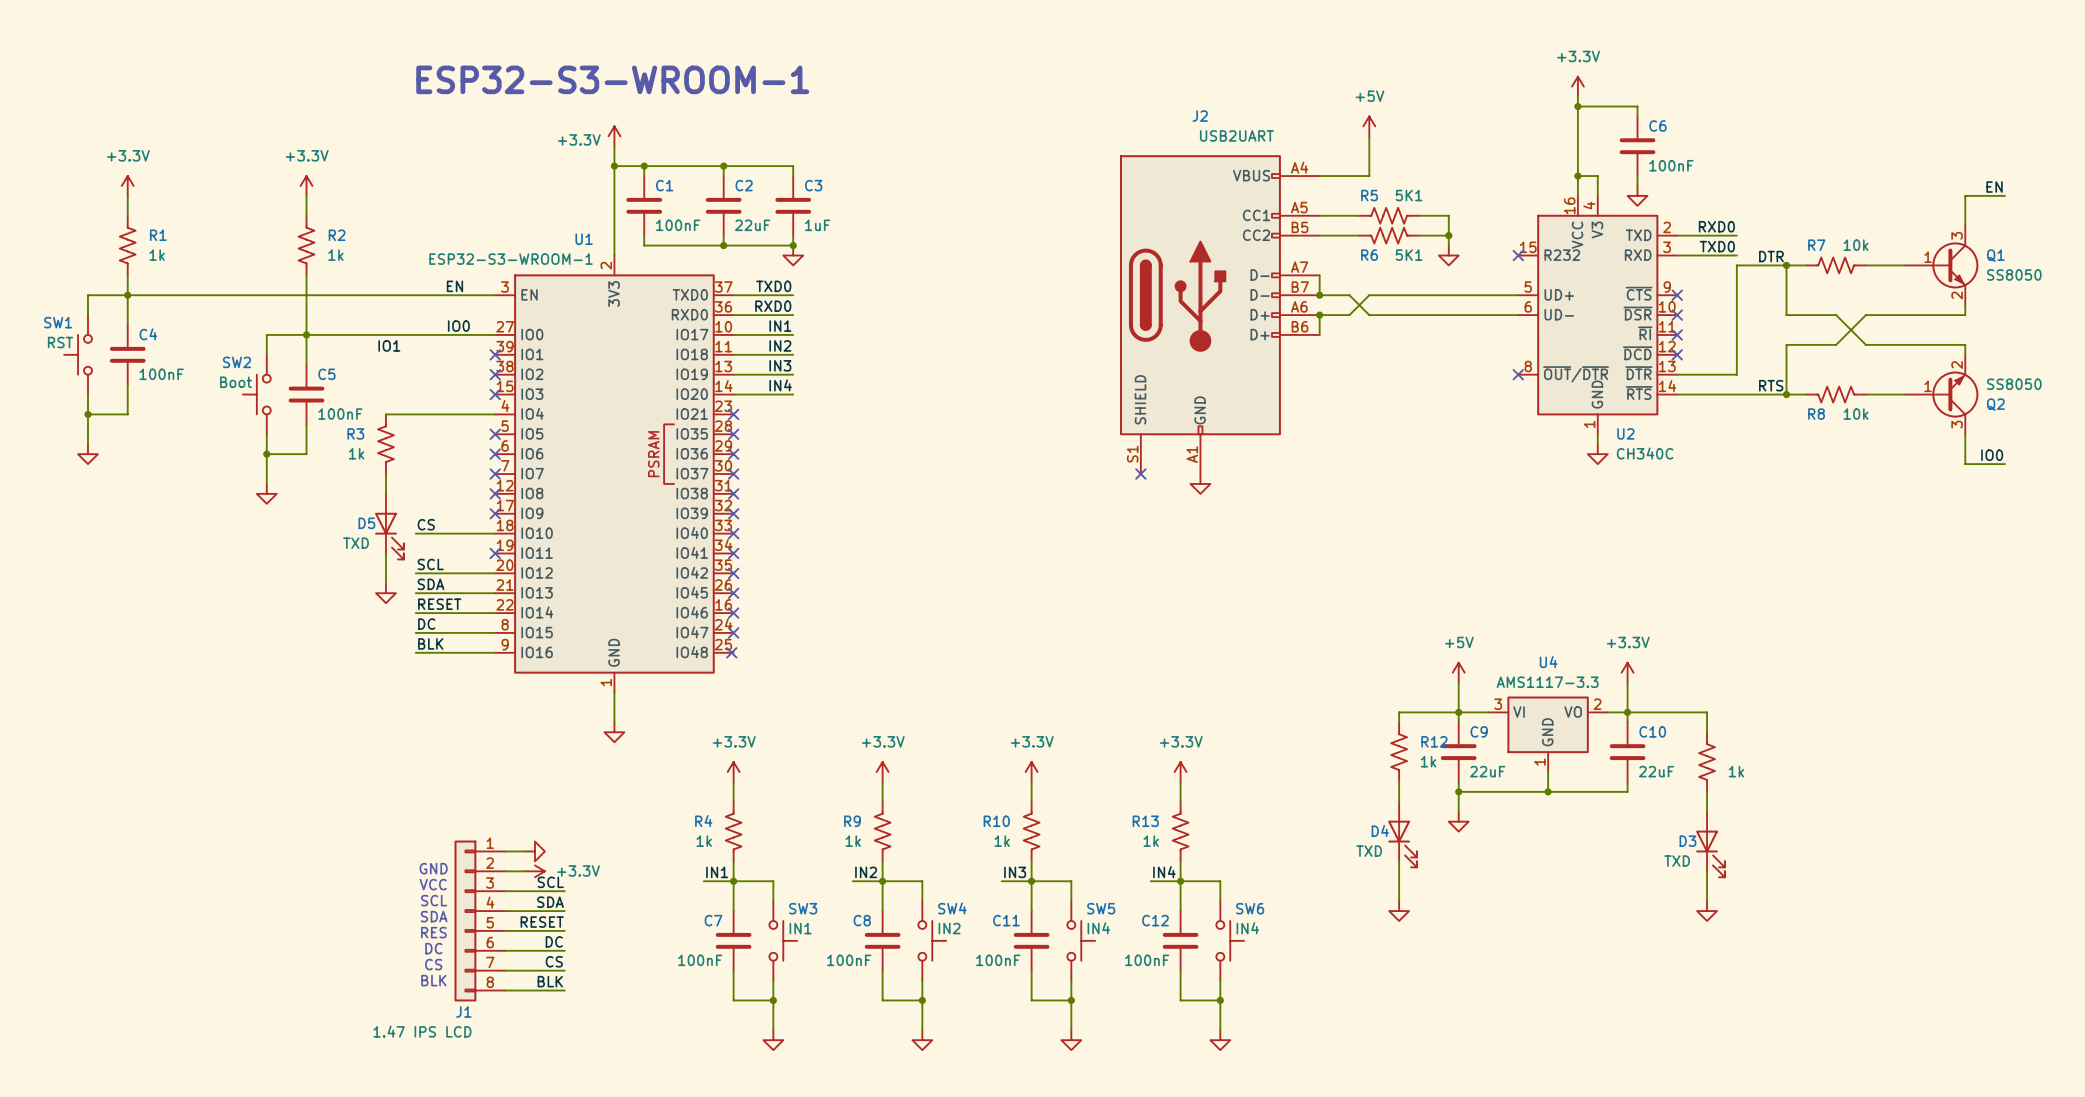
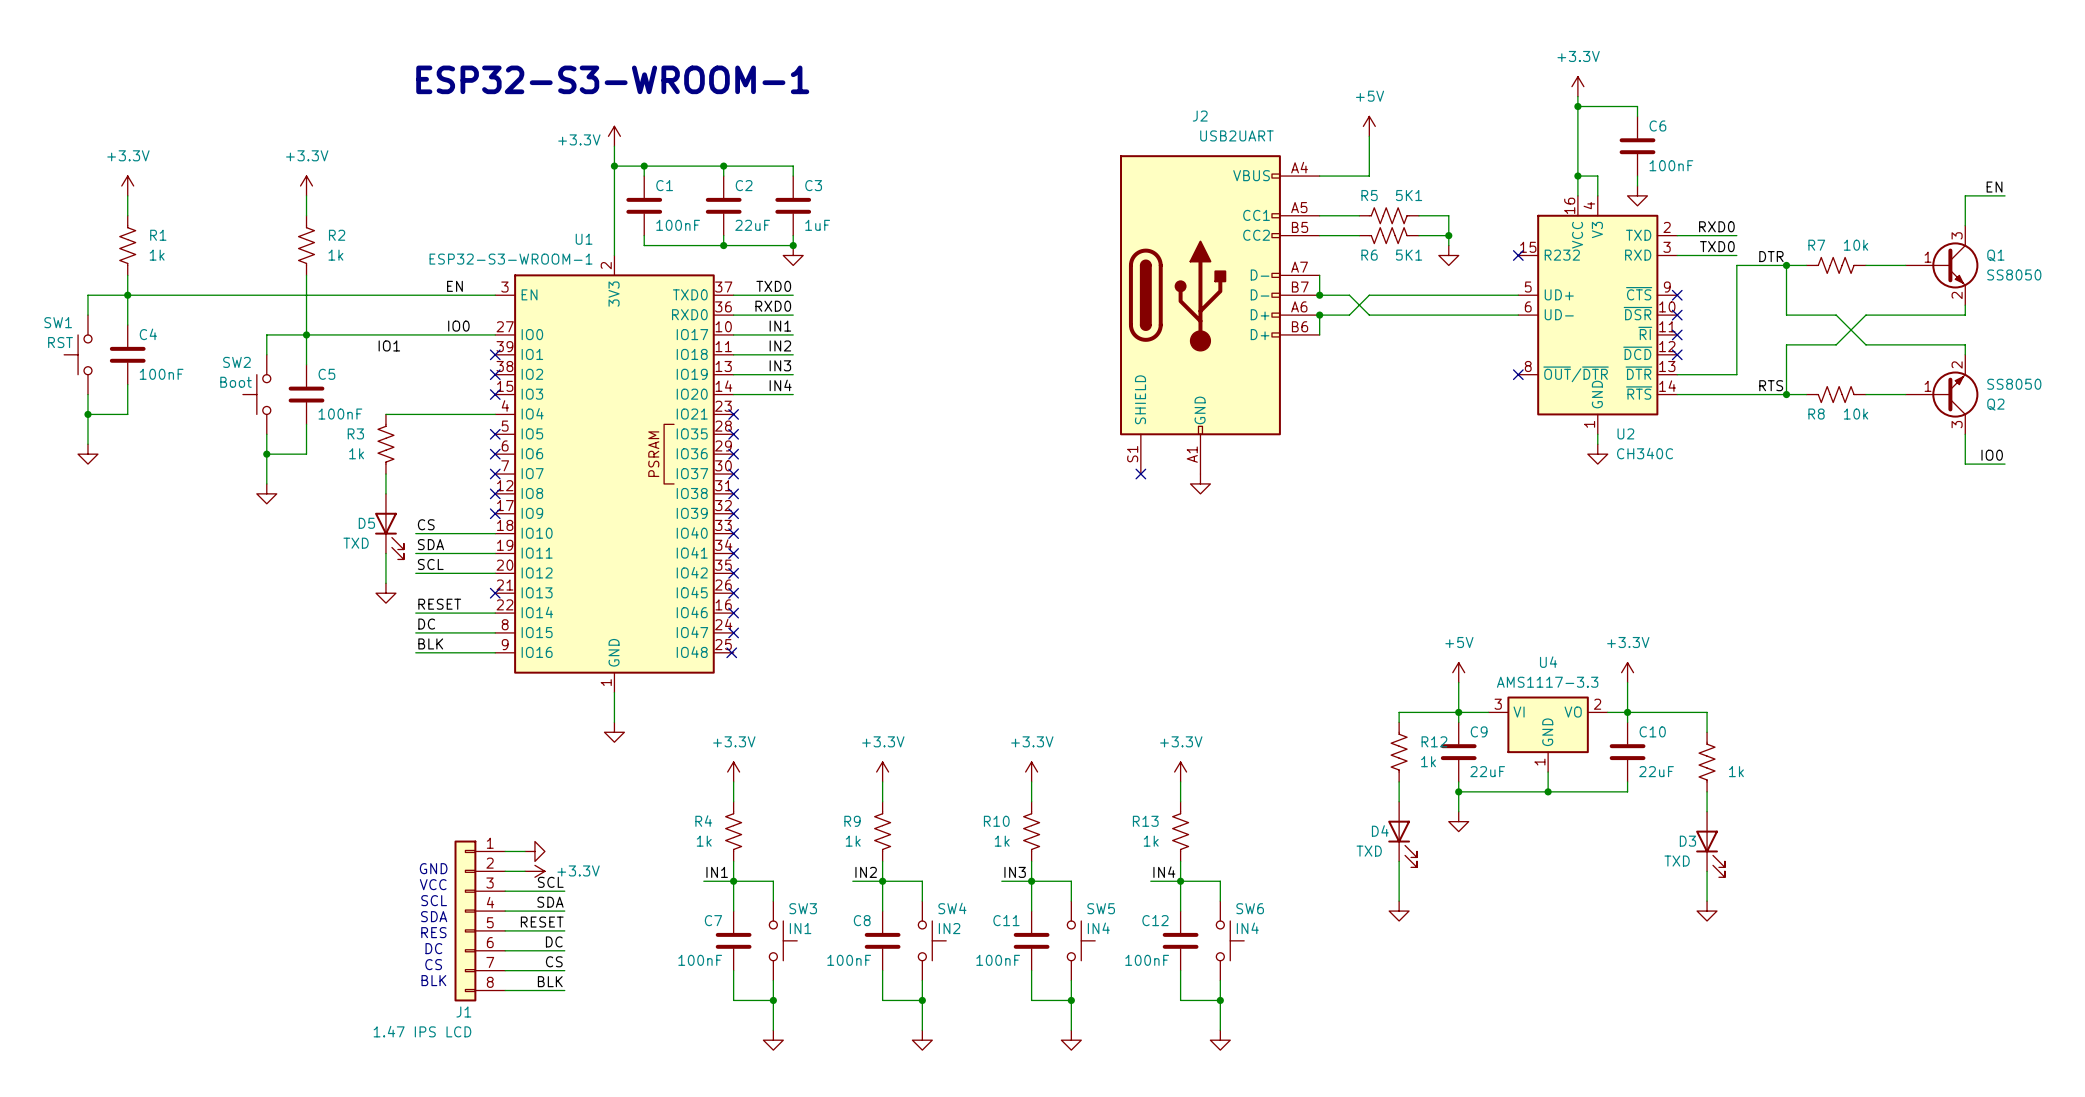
no-connect mark position: (495, 553) -> (495, 593)
label position: SDA (430, 584) -> SDA (430, 544)
wire: (415, 593) (495, 593) -> (415, 553) (495, 553)

